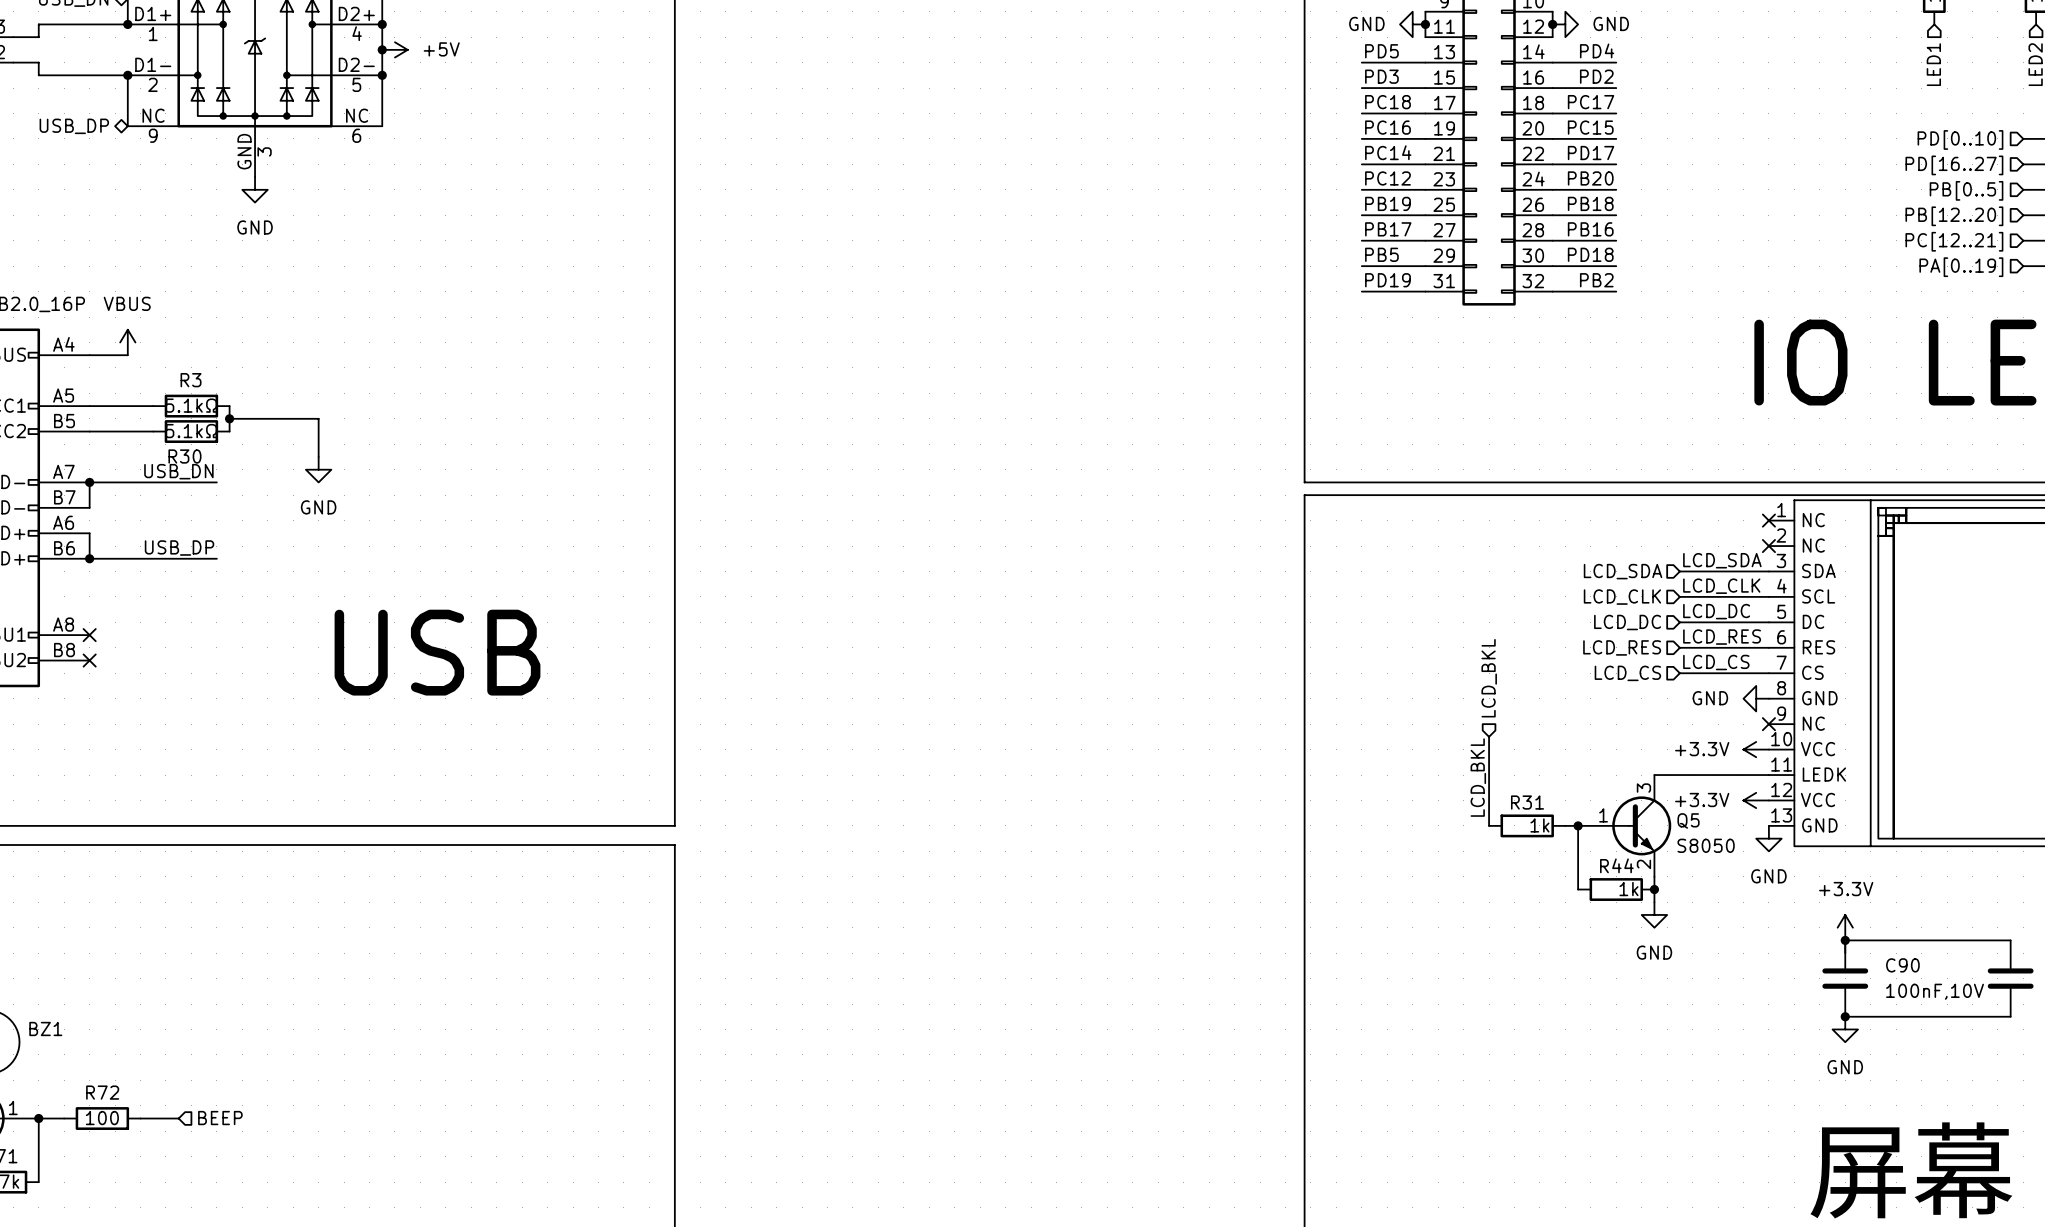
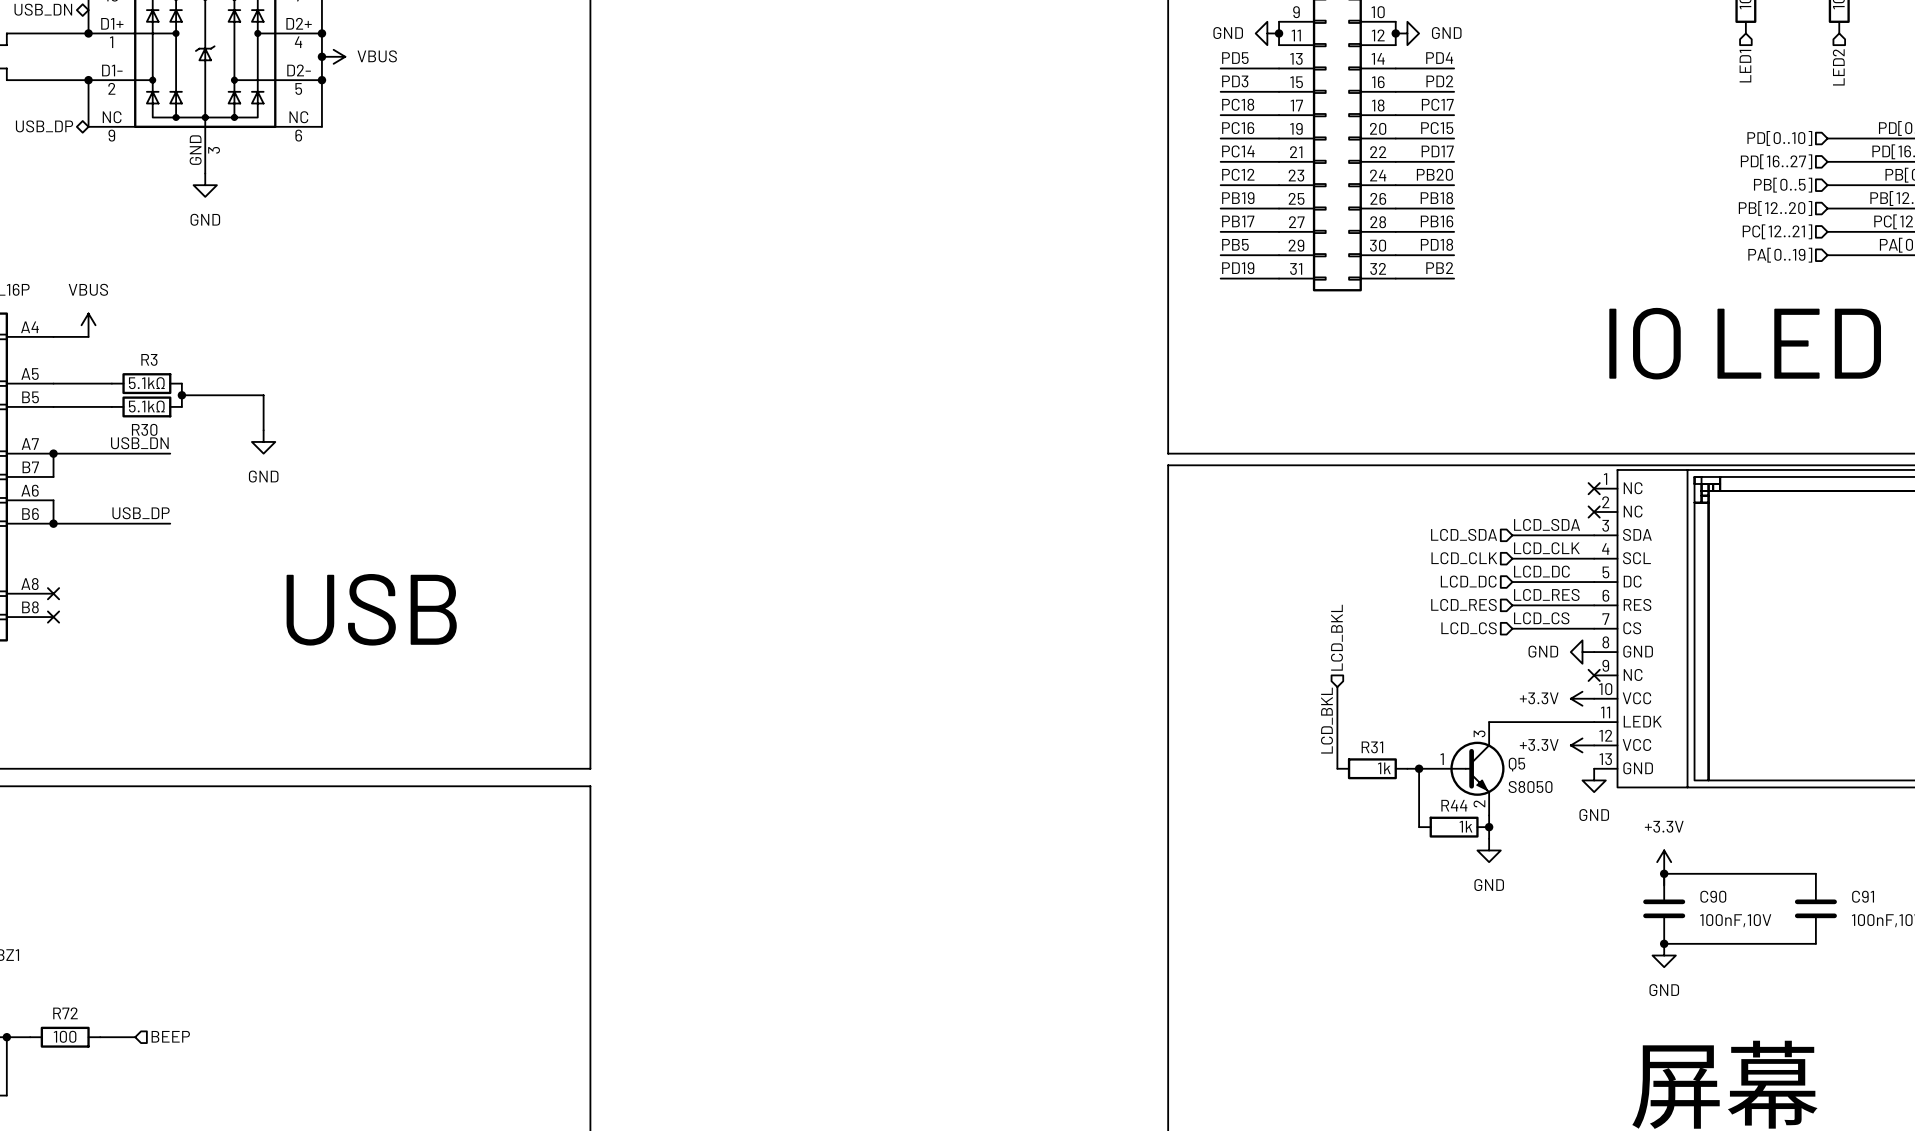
power symbol: +5V (394, 49) -> VBUS (333, 56)

